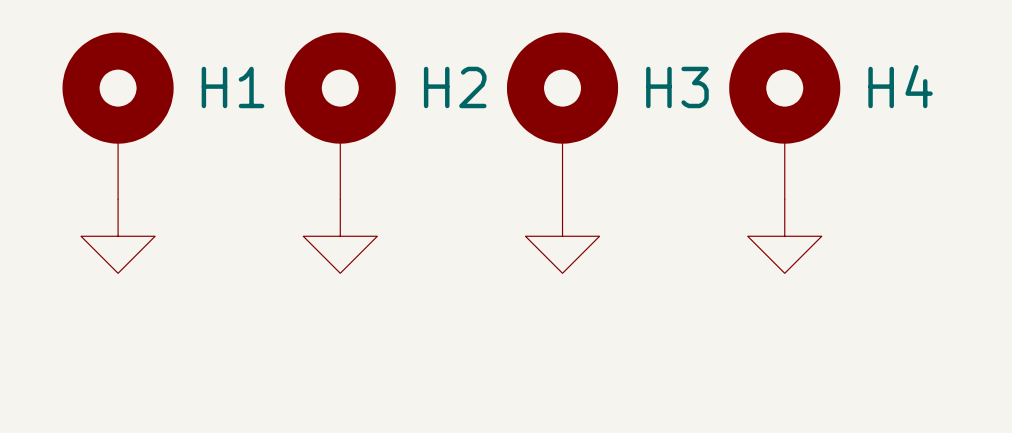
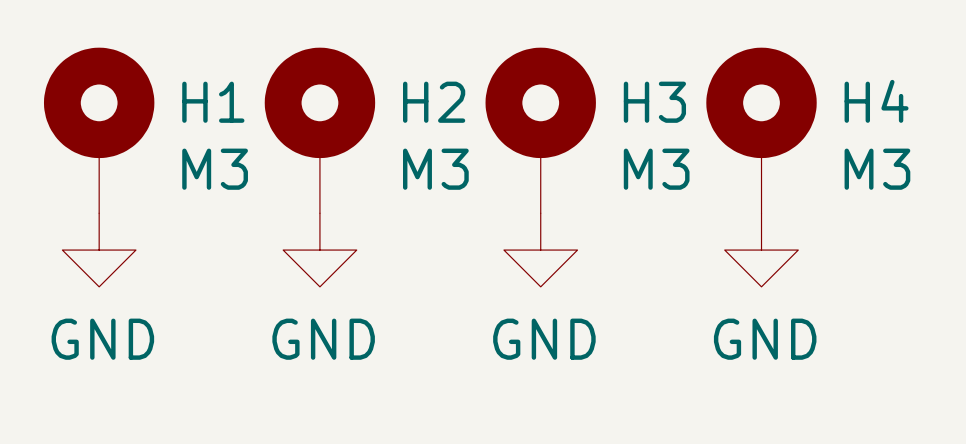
H1 value: none -> M3 (215, 169)
H2 value: none -> M3 (435, 169)
H3 value: none -> M3 (656, 169)
H4 value: none -> M3 (877, 169)
power symbol text: none -> GND (102, 339)
power symbol text: none -> GND (323, 339)
power symbol text: none -> GND (544, 339)
power symbol text: none -> GND (765, 339)

